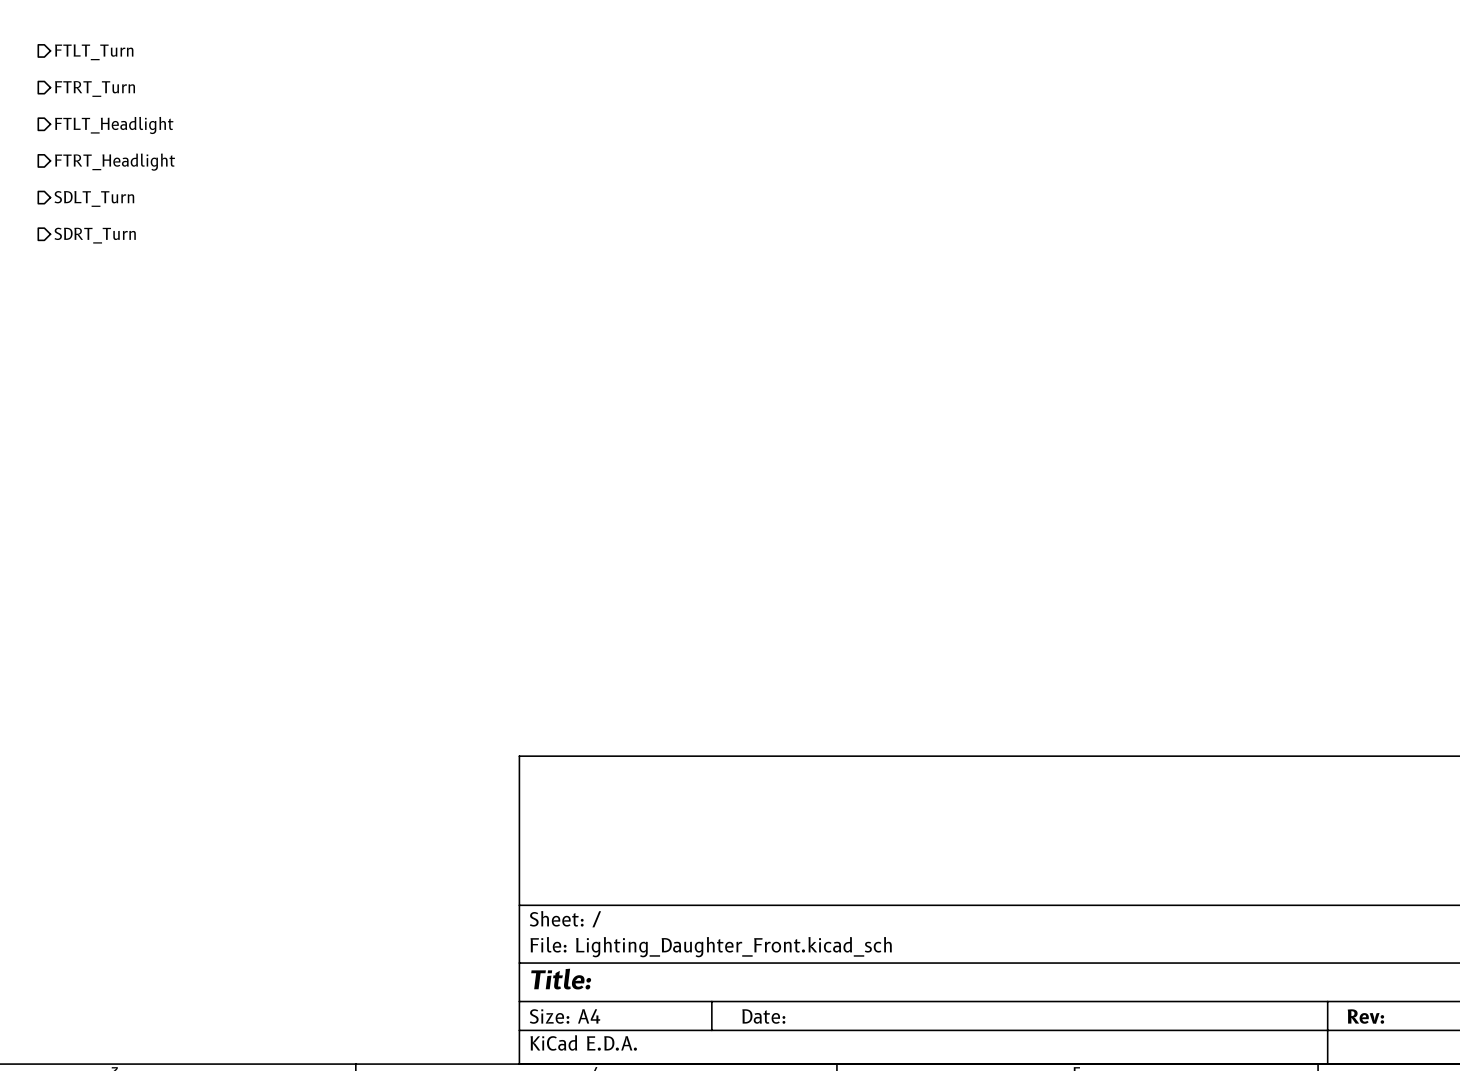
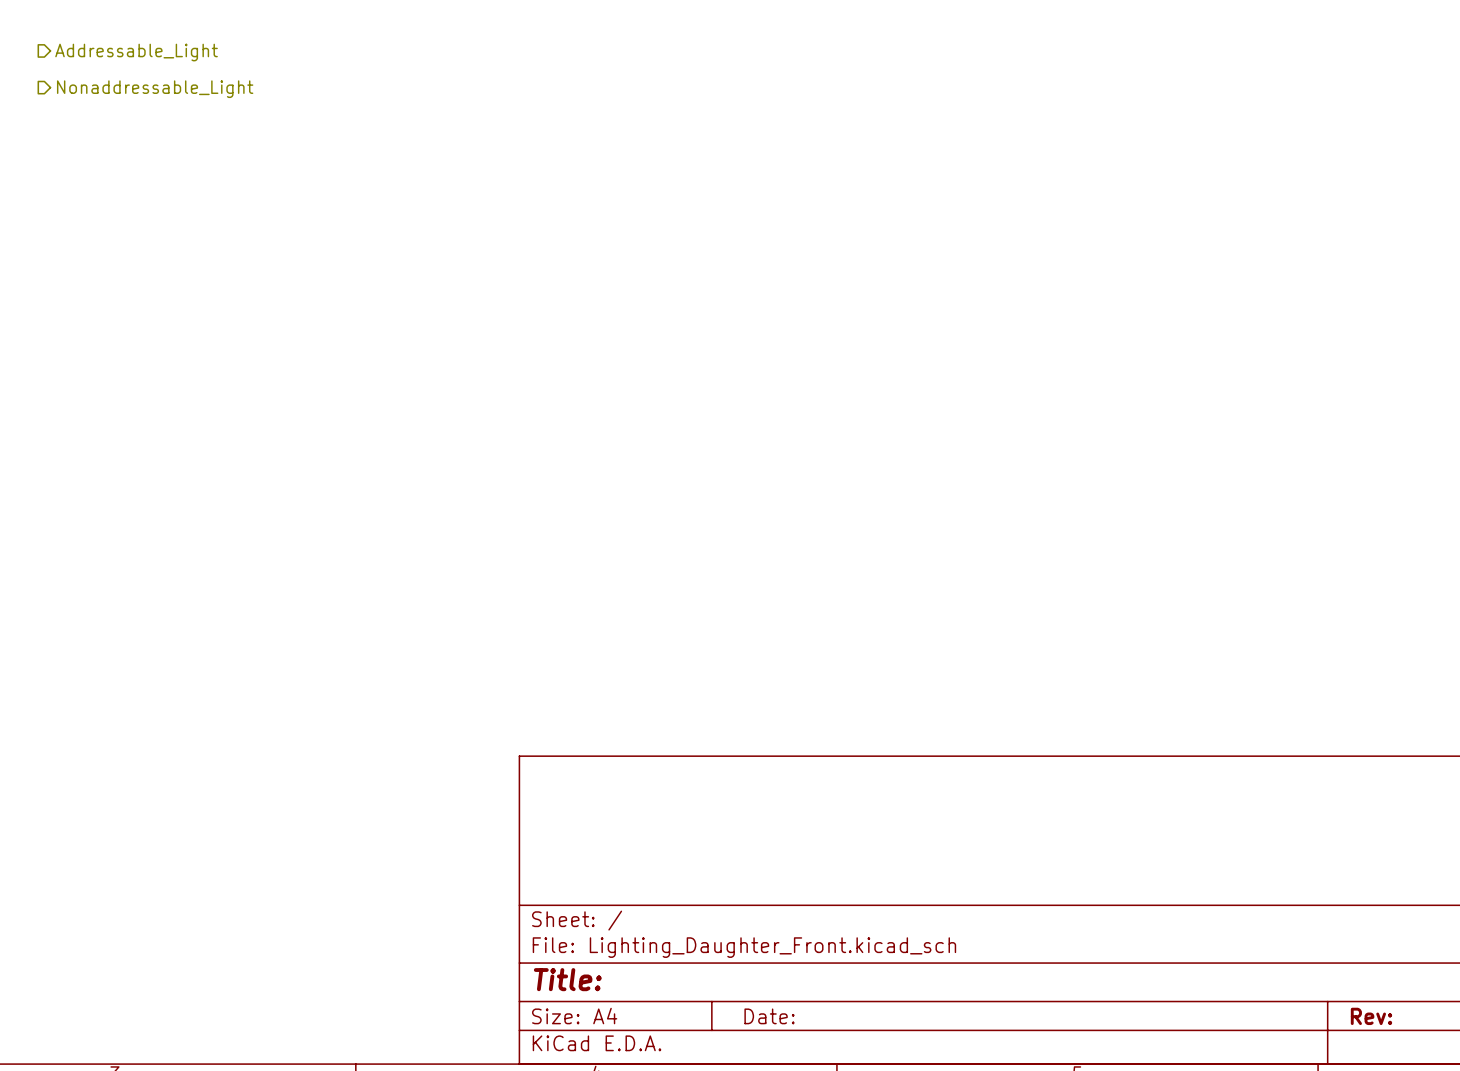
hierarchical label: FTLT_Turn (94, 52) -> Addressable_Light (136, 52)
hierarchical label: FTRT_Turn (95, 89) -> Nonaddressable_Light (155, 89)
hierarchical label: FTLT_Headlight (114, 125) -> none
hierarchical label: FTRT_Headlight (115, 162) -> none
hierarchical label: SDLT_Turn (94, 198) -> none
hierarchical label: SDRT_Turn (95, 235) -> none

